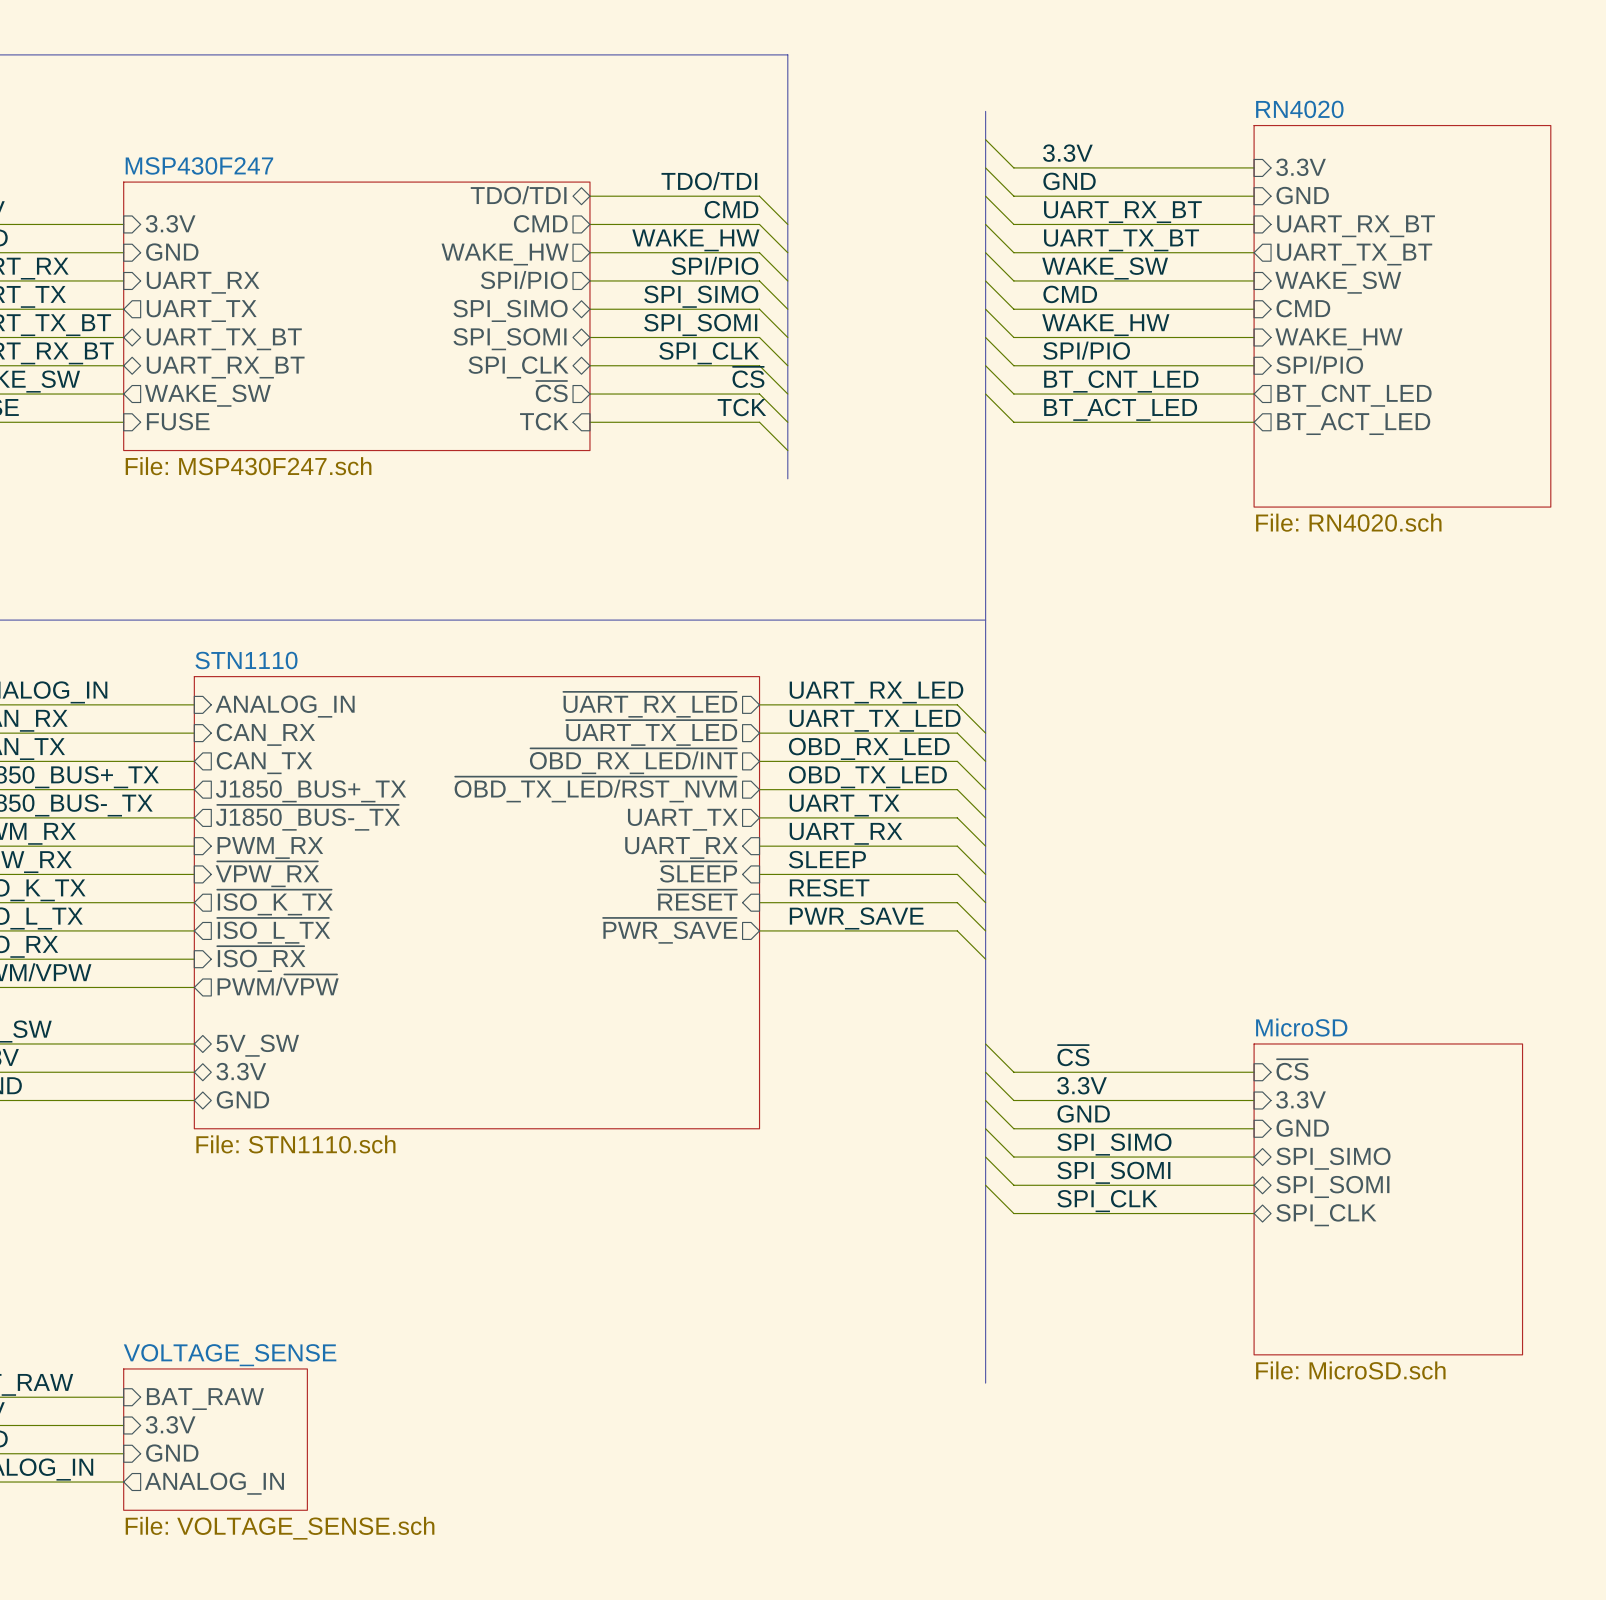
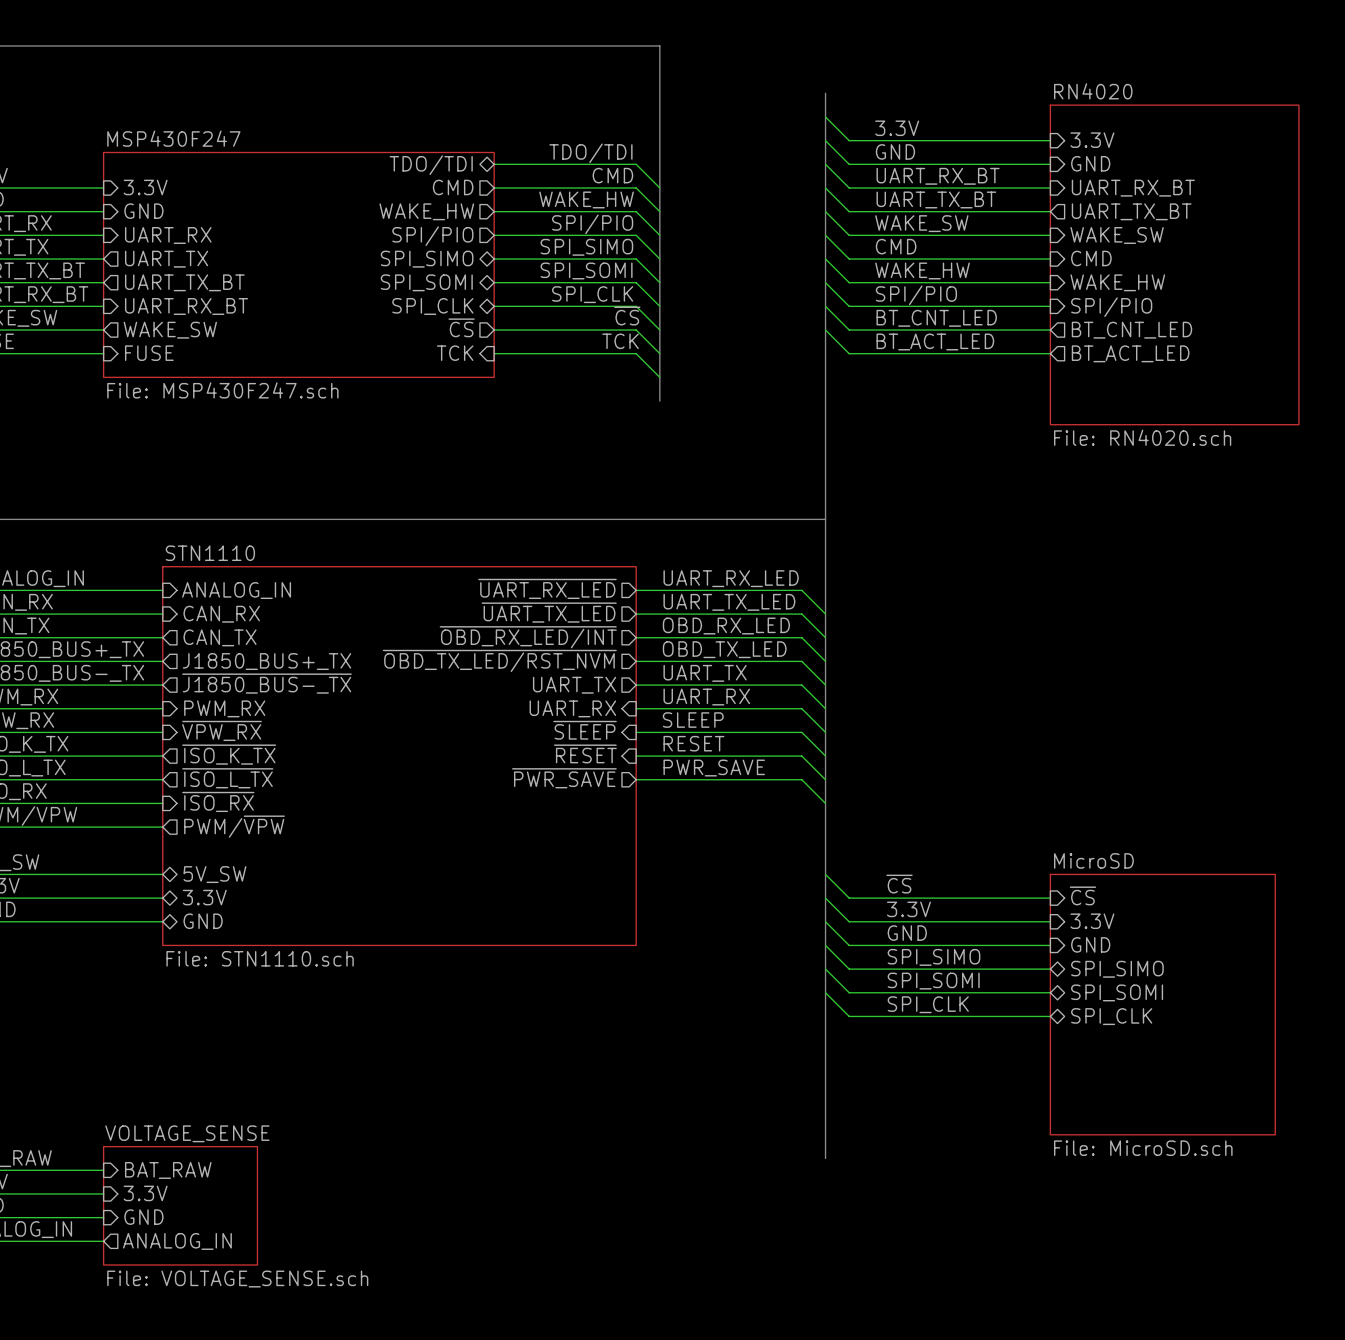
sheet pin shape: bidirectional (224, 339) -> output (184, 282)
sheet pin shape: bidirectional (225, 367) -> input (186, 306)

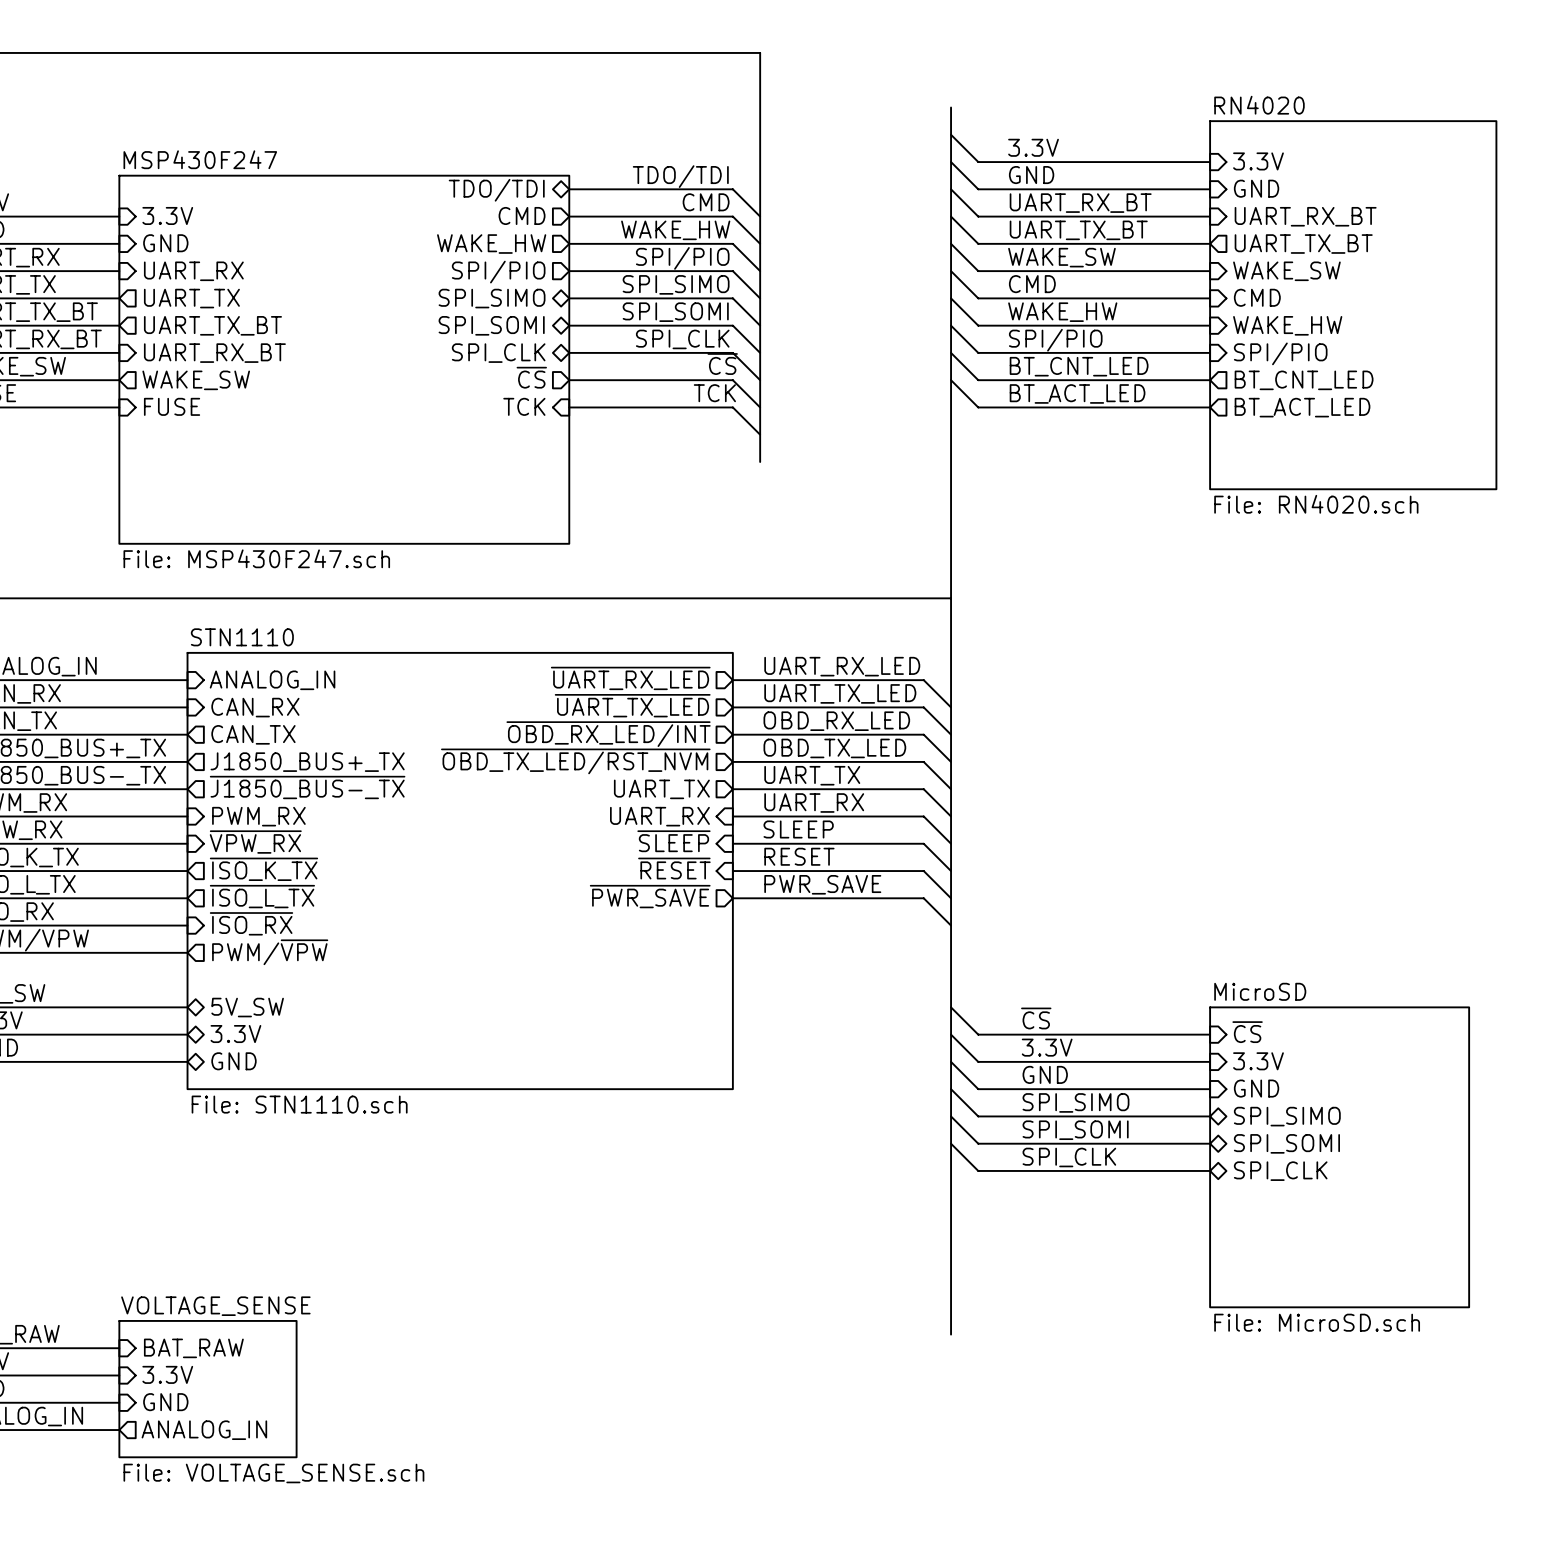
sheet MSP430F247 shape: [103, 152, 495, 378] -> [119, 175, 570, 544]
sheet MSP430F247 value position: File: MSP430F247.sch (222, 390) -> File: MSP430F247.sch (256, 558)

